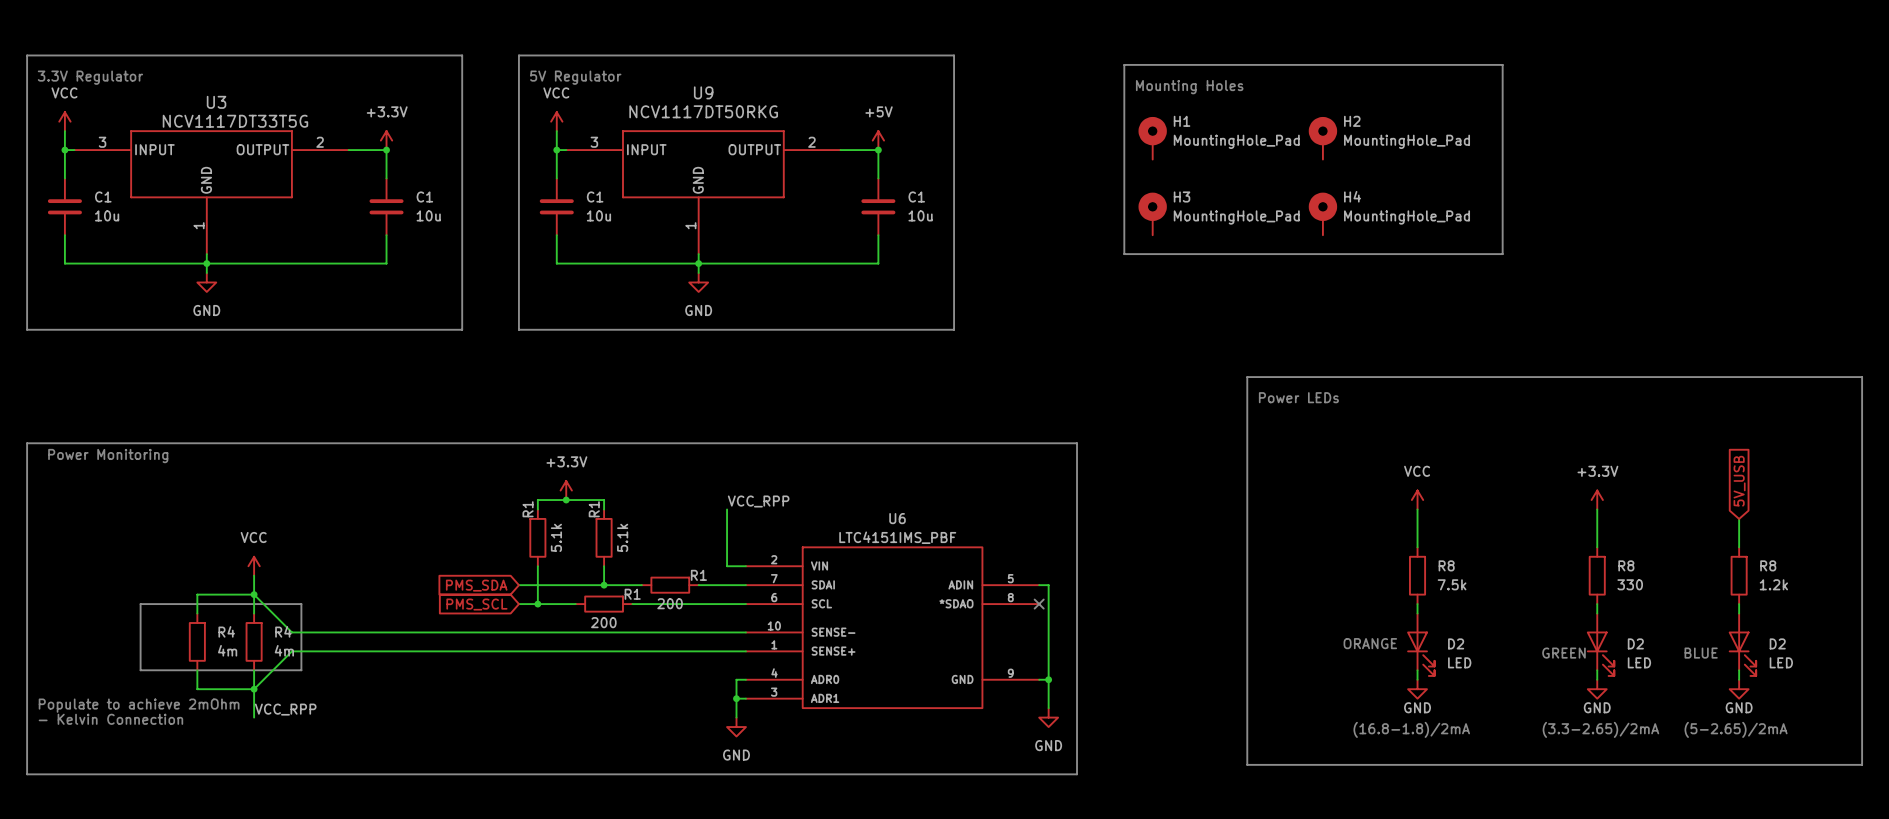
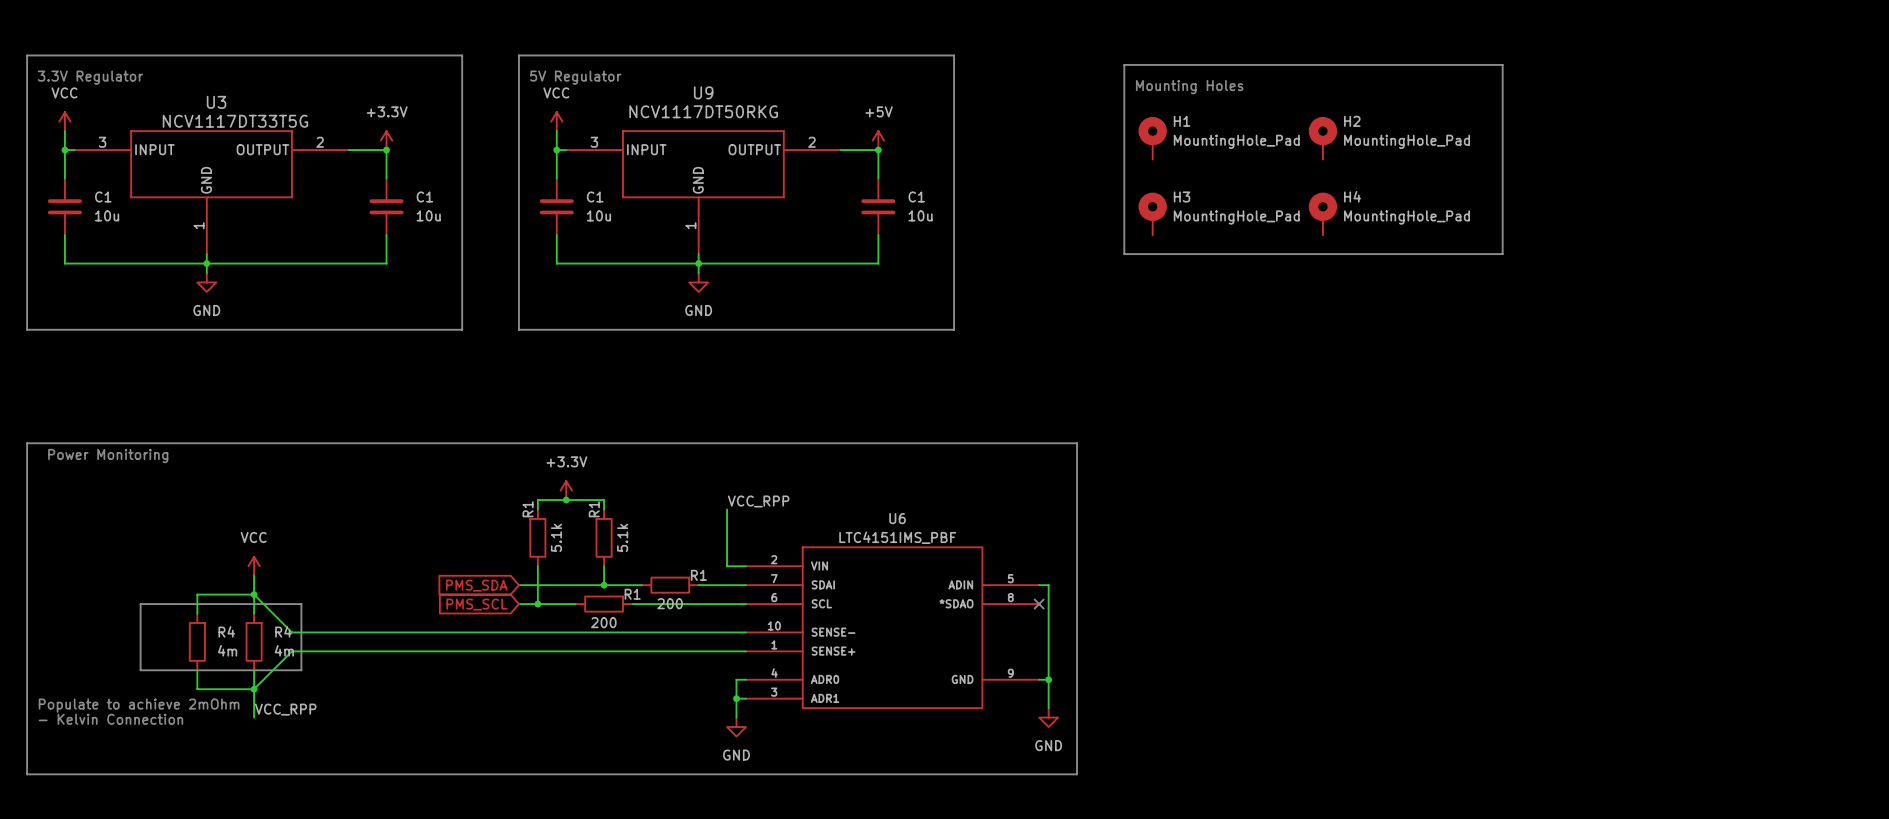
line: (1247, 377) (1862, 377) (1862, 764) (1247, 764) (1247, 377) -> none
text: Power LEDs (1298, 397) -> none
global label: 5V_USB (1739, 481) -> none
power symbol: VCC (1417, 500) -> none
power symbol: +3.3V (1597, 500) -> none
wire: (1417, 509) (1417, 547) -> none
wire: (1597, 509) (1597, 547) -> none
wire: (1739, 518) (1739, 547) -> none
R8: 7.5k (1417, 575) -> none
R8: 330 (1597, 575) -> none
R8: 1.2k (1739, 575) -> none
wire: (1417, 604) (1417, 613) -> none
wire: (1597, 604) (1597, 613) -> none
wire: (1739, 604) (1739, 613) -> none
text: ORANGE (1370, 643) -> none
D2: LED (1420, 644) -> none
D2: LED (1600, 644) -> none
D2: LED (1742, 644) -> none
text: GREEN (1563, 653) -> none
text: BLUE (1701, 653) -> none
wire: (1417, 670) (1417, 679) -> none
wire: (1597, 670) (1597, 679) -> none
wire: (1739, 670) (1739, 679) -> none
power symbol: GND (1417, 689) -> none
power symbol: GND (1597, 689) -> none
power symbol: GND (1739, 689) -> none
text: (16.8-1.8)/2mA (1411, 729) -> none
text: (3.3-2.65)/2mA (1600, 729) -> none
text: (5-2.65)/2mA (1736, 729) -> none

